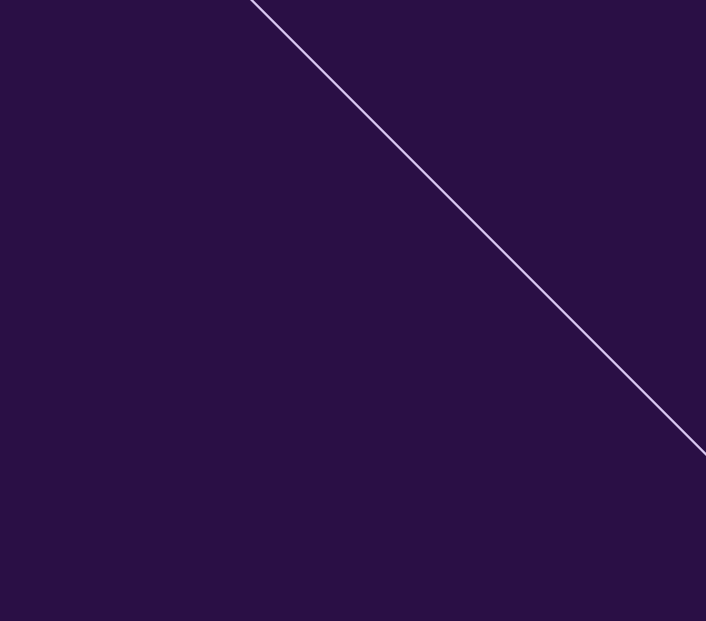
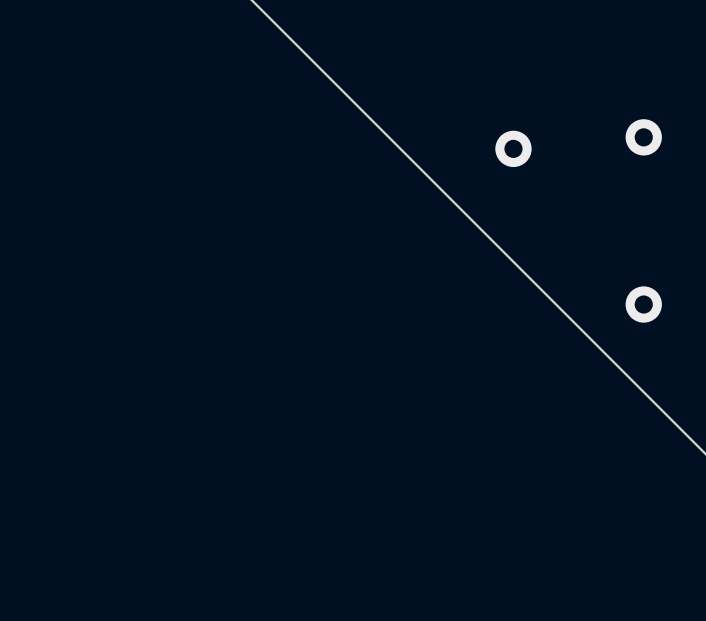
via: none -> (643, 137)
via: none -> (513, 148)
via: none -> (643, 304)

